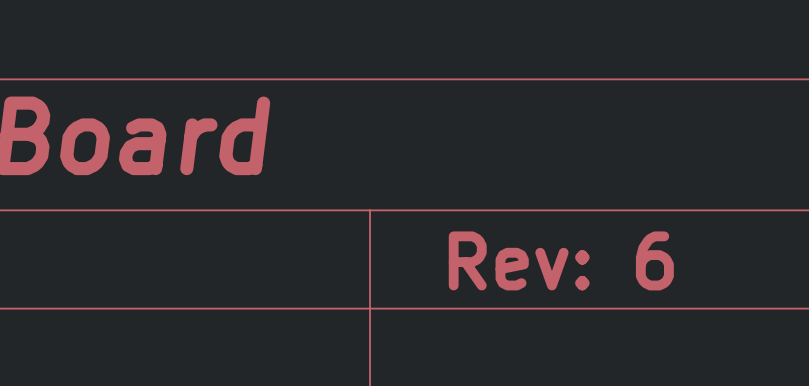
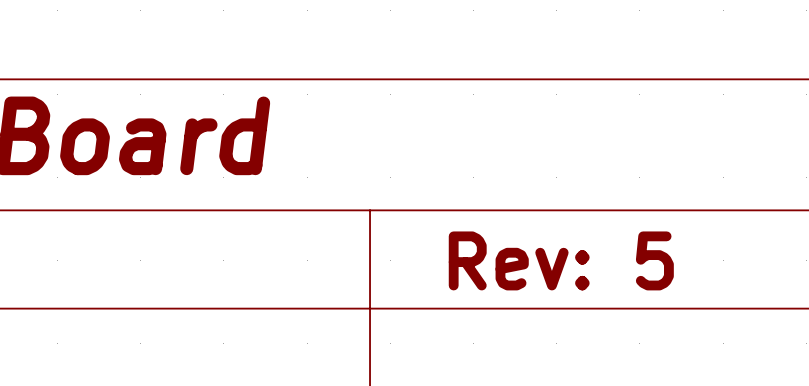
title block: Rev: 6 (561, 260) -> Rev: 5 (561, 260)

